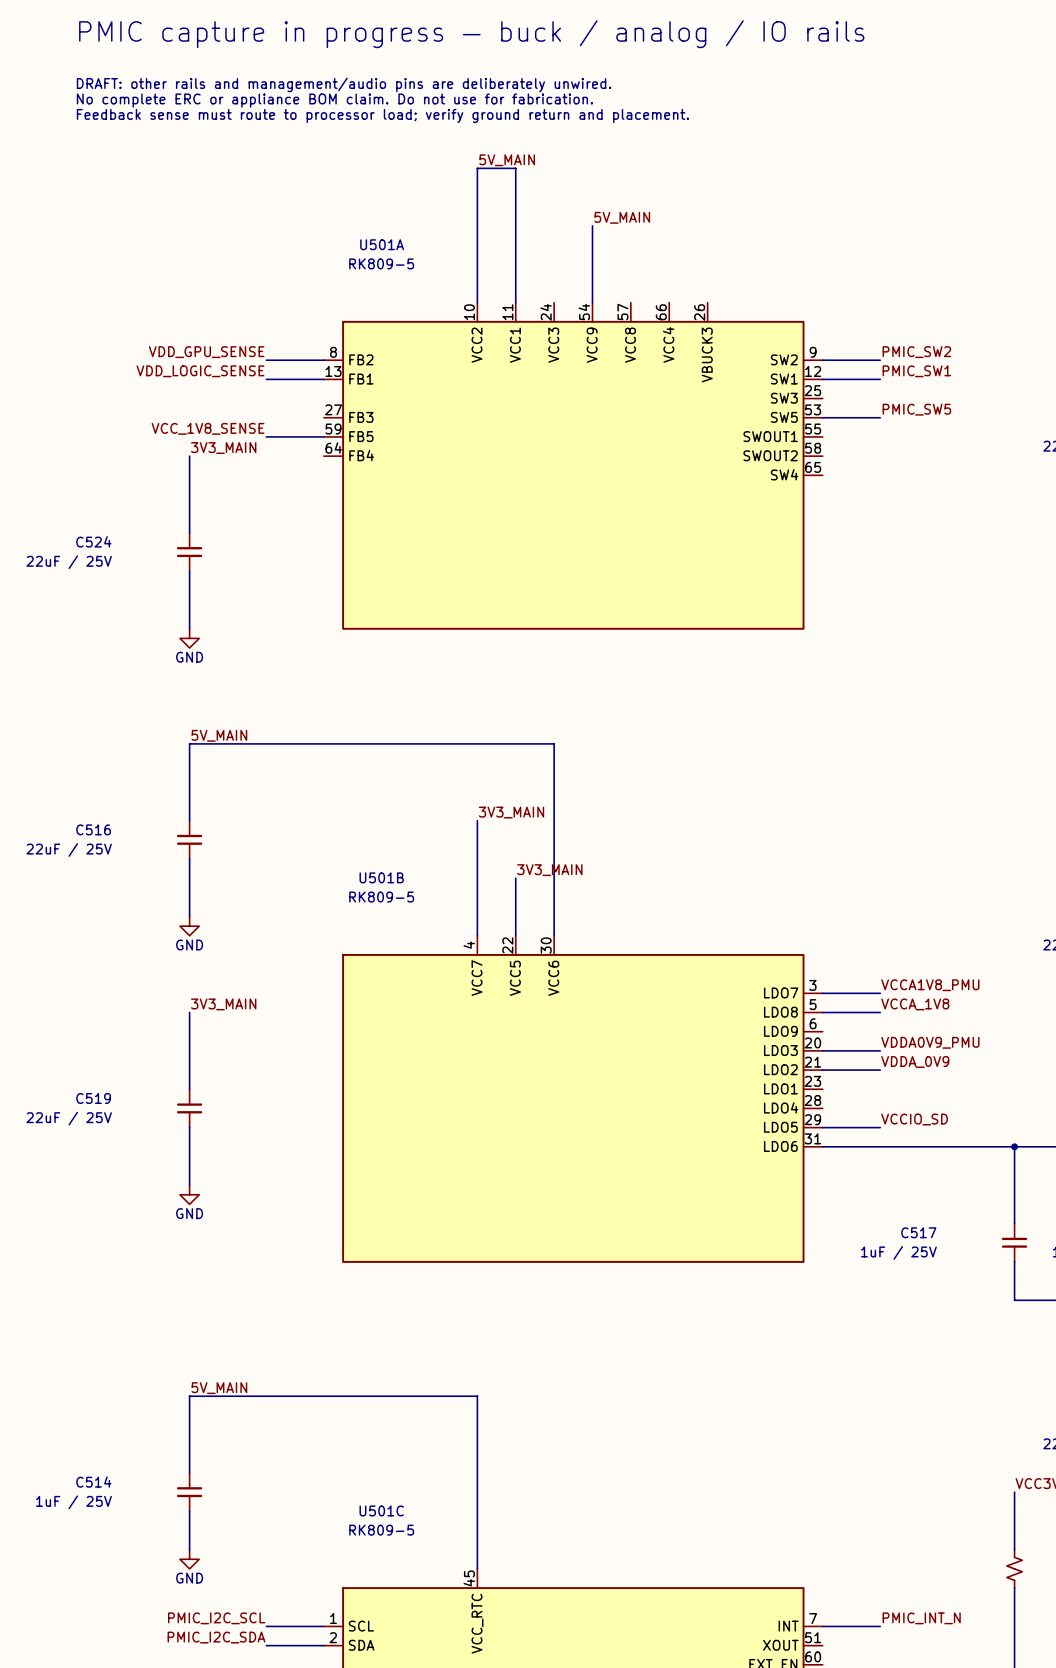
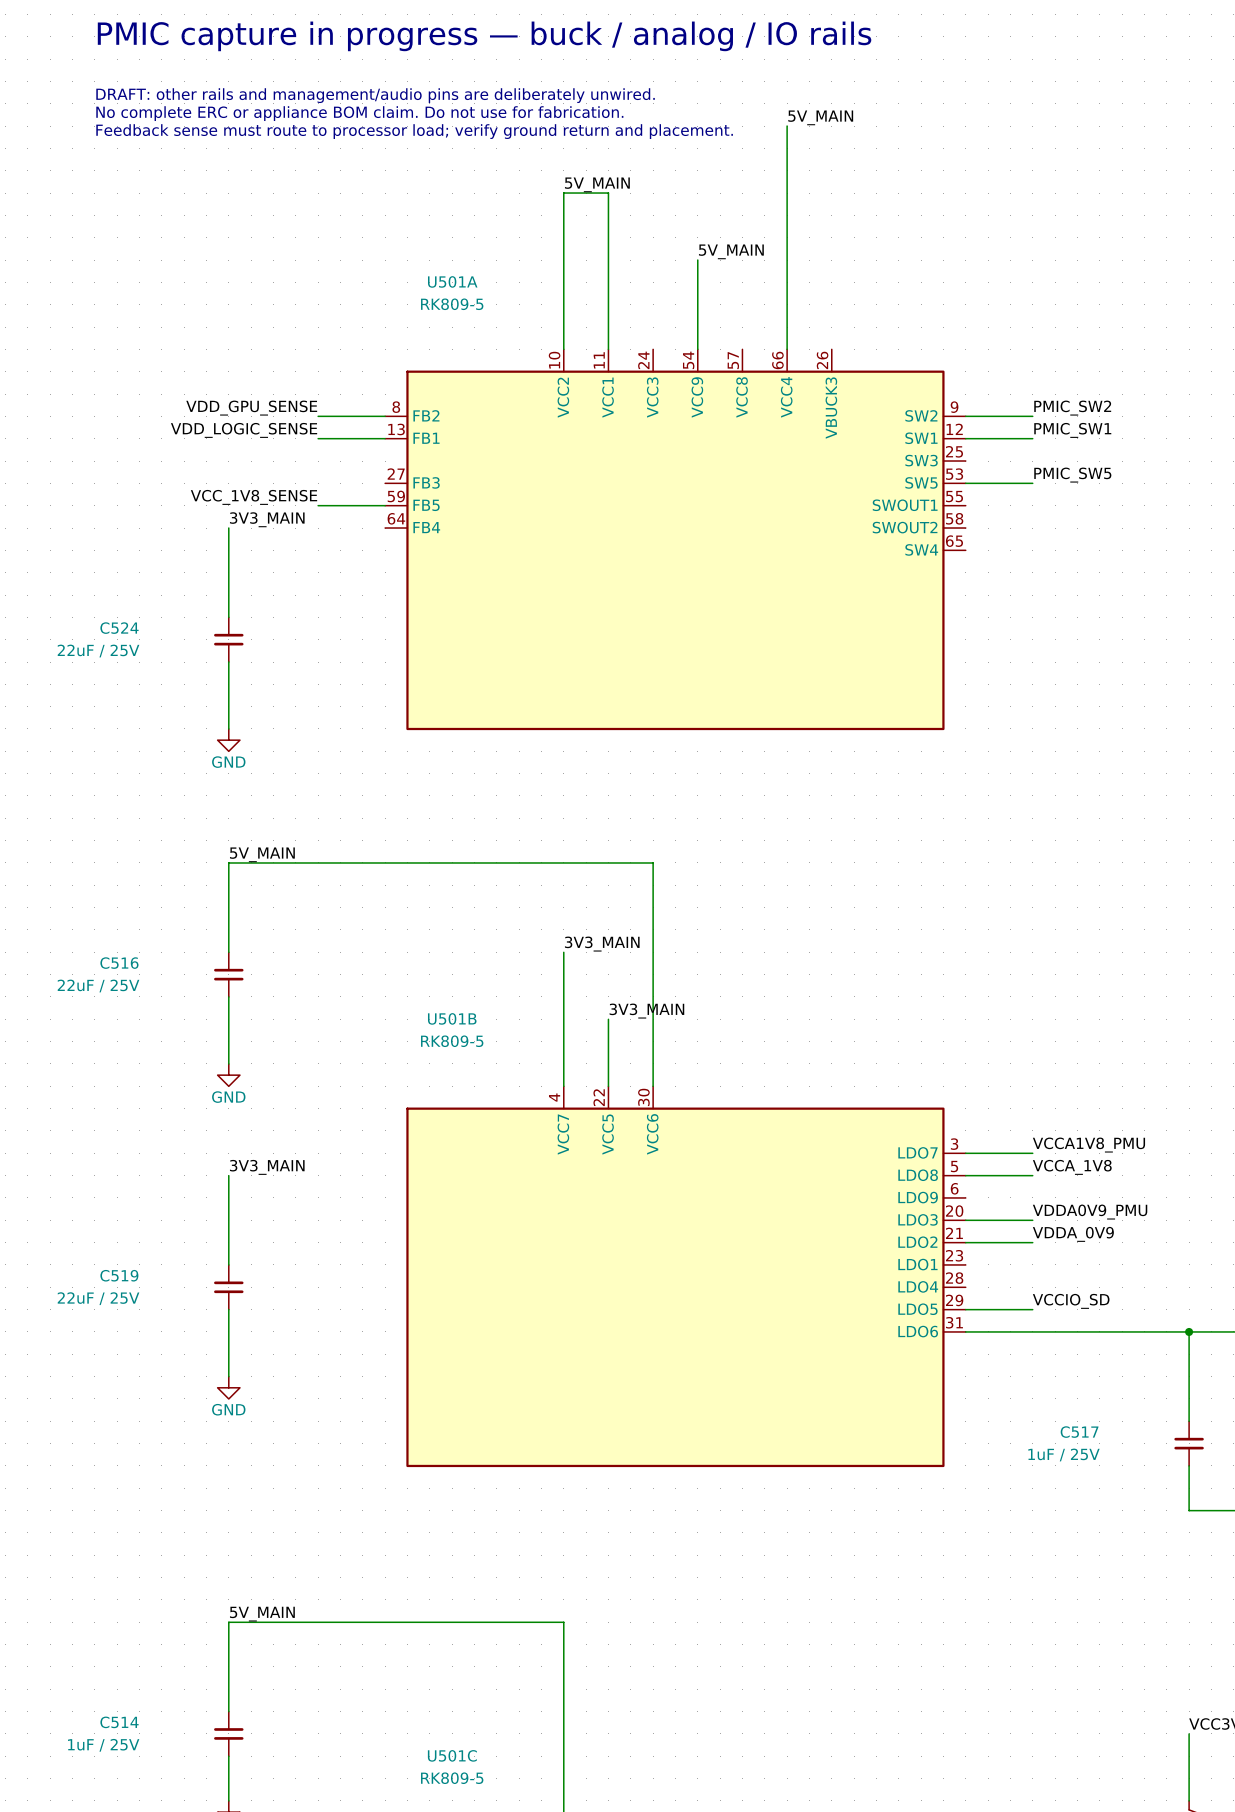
label: none -> 5V_MAIN (820, 117)
wire: none -> (787, 126) (787, 349)

